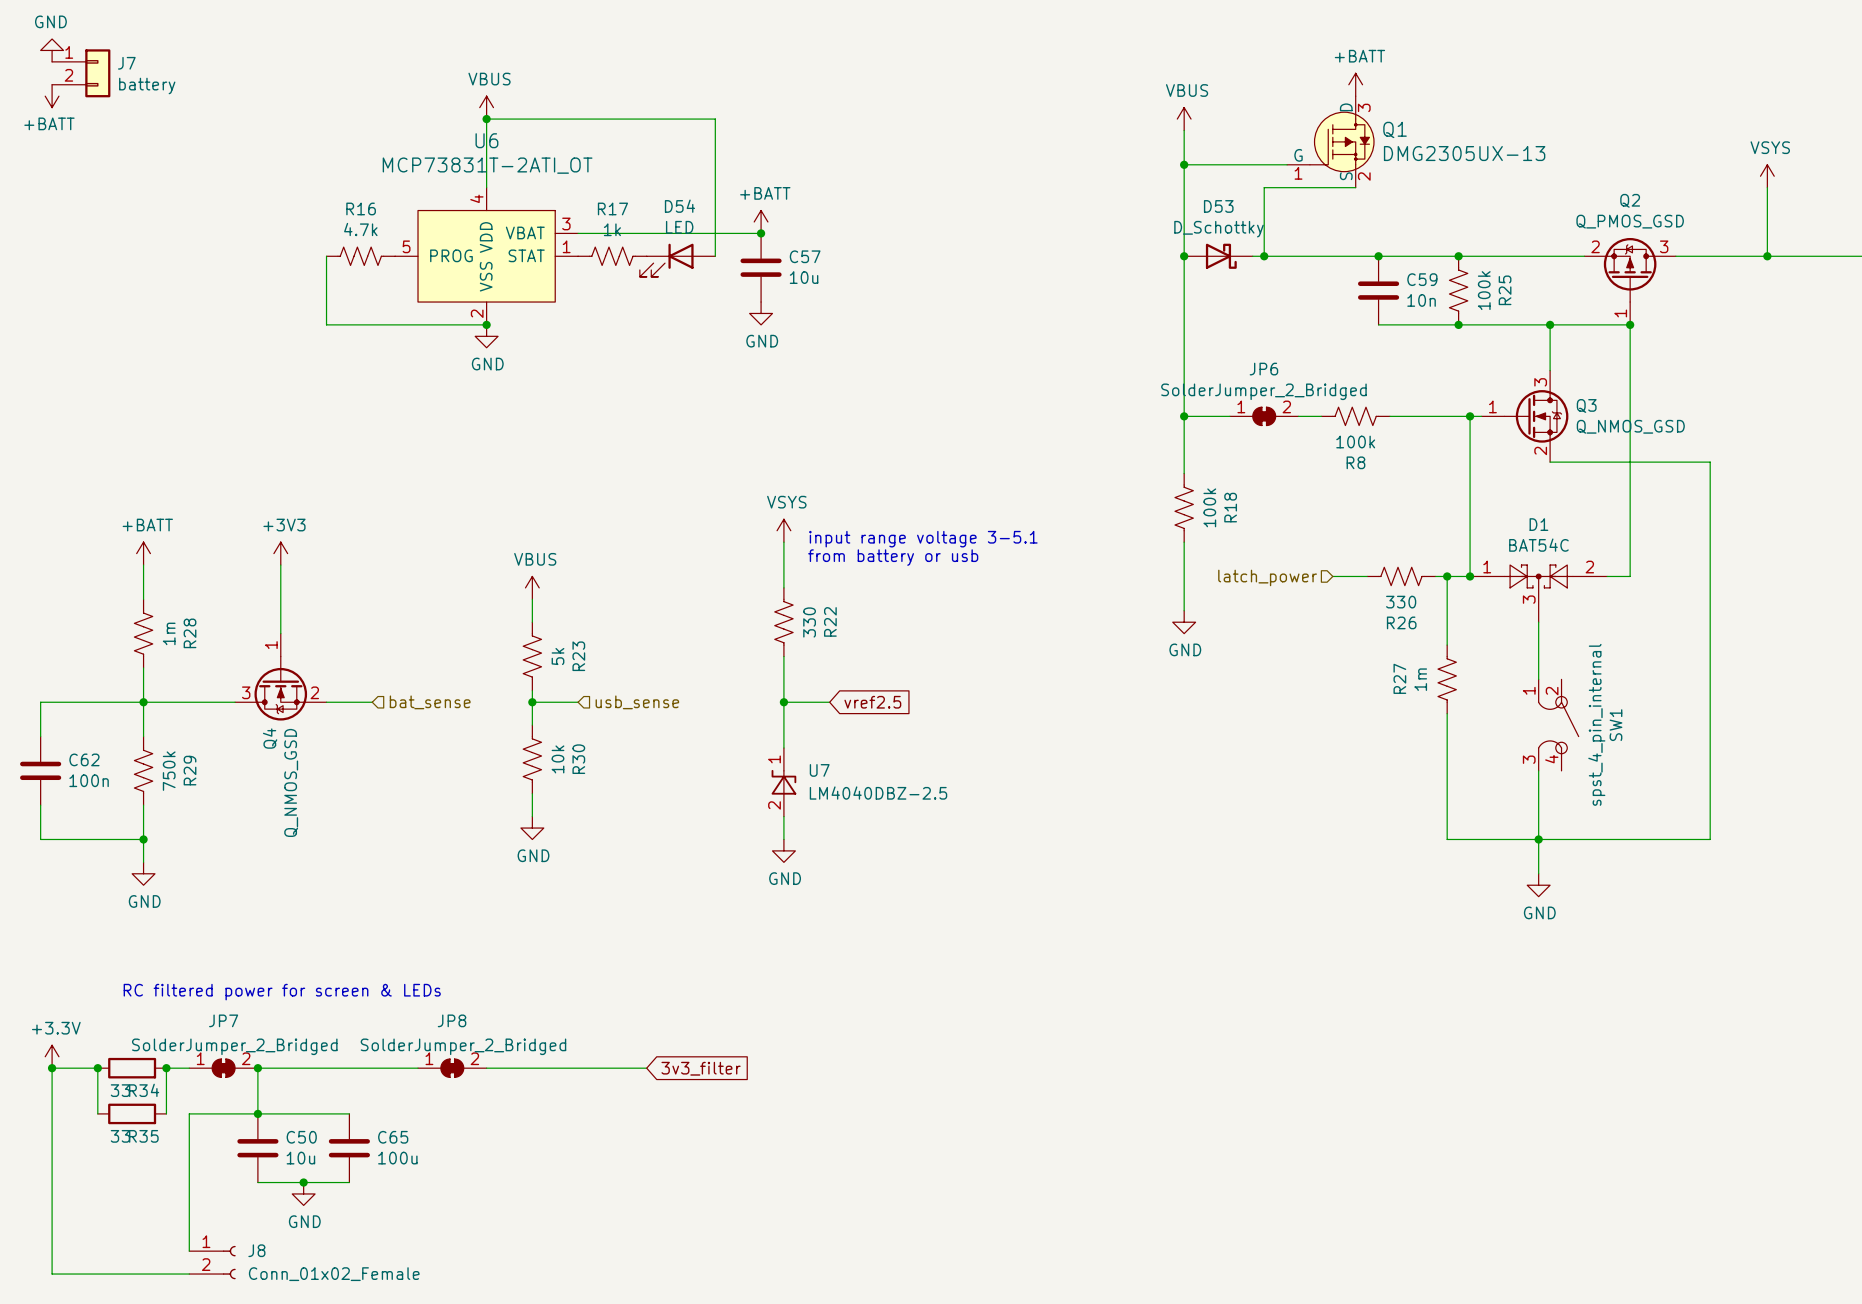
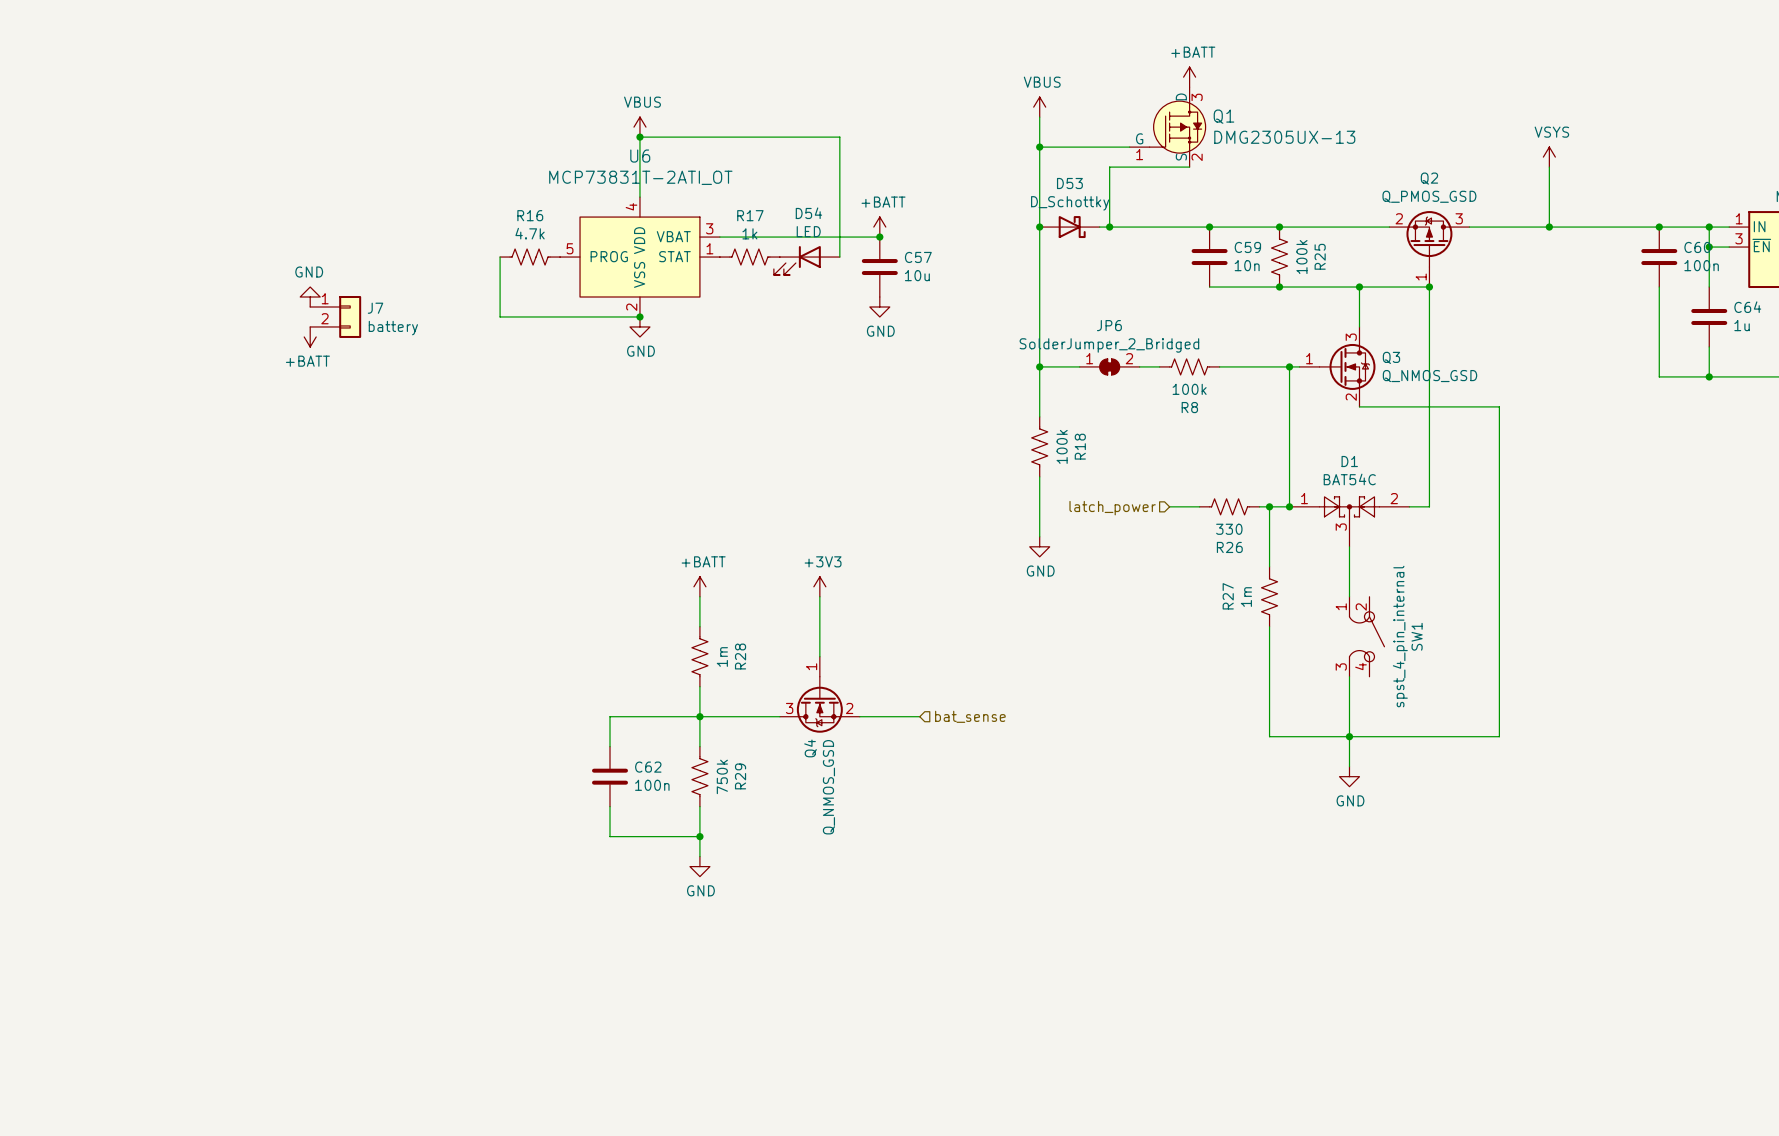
power symbol: GND (52, 50) -> none
J7 position: (81, 73) -> (335, 316)
power symbol: +BATT (52, 96) -> none
power symbol: VBUS (486, 107) -> none
junction: (486, 119) -> none
power symbol: none -> VBUS (639, 127)
junction: none -> (639, 137)
wire: (486, 187) (486, 119) (715, 119) (715, 256) -> none
wire: none -> (639, 197) (639, 137) (839, 137) (839, 257)
power symbol: +BATT (761, 221) -> none
wire: (578, 233) (761, 233) -> none
junction: (761, 233) -> none
wire: (326, 256) (326, 324) (486, 324) -> none
R16 position: (360, 256) -> (530, 257)
U6 position: (486, 256) -> (639, 257)
R17 position: (612, 256) -> (749, 257)
power symbol: none -> +BATT (879, 227)
D54 position: (677, 260) -> (806, 260)
C57 position: (761, 267) -> (879, 267)
wire: none -> (719, 237) (879, 237)
junction: none -> (879, 237)
wire: none -> (500, 257) (500, 316) (639, 316)
power symbol position: GND (761, 313) -> GND (639, 326)
junction: (486, 324) -> none
power symbol: none -> GND (310, 297)
power symbol: GND (486, 336) -> none
power symbol: none -> GND (879, 306)
junction: none -> (639, 316)
power symbol: none -> +BATT (310, 336)
power symbol: VSYS (783, 530) -> none
text: input range voltage 3-5.1 (923, 539) -> none
wire: (783, 542) (783, 587) -> none
power symbol: +BATT (143, 553) -> none
power symbol: +3V3 (280, 553) -> none
text: from battery or usb (893, 557) -> none
wire: (143, 565) (143, 599) -> none
wire: (280, 565) (280, 633) -> none
power symbol: VBUS (532, 587) -> none
wire: (532, 599) (532, 622) -> none
R22: 330 (783, 622) -> none
R28 position: (143, 633) -> (699, 656)
R23: 5k (532, 656) -> none
wire: (783, 656) (783, 747) -> none
wire: (143, 667) (143, 736) -> none
power symbol: none -> +BATT (699, 586)
power symbol: none -> +3V3 (819, 586)
Q4 position: (280, 677) -> (819, 694)
wire: none -> (699, 596) (699, 626)
wire: none -> (819, 596) (819, 656)
wire: (532, 690) (532, 725) -> none
junction: (143, 702) -> none
wire: (235, 702) (40, 702) (40, 736) -> none
wire: (326, 702) (372, 702) -> none
hierarchical label: bat_sense (430, 702) -> none
wire: (532, 702) (578, 702) -> none
junction: (532, 702) -> none
hierarchical label: usb_sense (637, 702) -> none
wire: (783, 702) (829, 702) -> none
junction: (783, 702) -> none
global label: vref2.5 (872, 702) -> none
R30: 10k (532, 759) -> none
C62 position: (40, 770) -> (609, 776)
R29 position: (143, 770) -> (699, 776)
U7: LM4040DBZ-2.5 (783, 782) -> none
wire: none -> (699, 686) (699, 746)
wire: (532, 793) (532, 816) -> none
wire: (40, 805) (40, 839) (143, 839) -> none
wire: (143, 805) (143, 862) -> none
wire: (783, 816) (783, 839) -> none
junction: none -> (699, 716)
wire: none -> (779, 716) (609, 716) (609, 746)
wire: none -> (859, 716) (919, 716)
hierarchical label: none -> bat_sense (970, 716)
power symbol: GND (532, 828) -> none
junction: (143, 839) -> none
power symbol position: GND (783, 850) -> GND (699, 866)
power symbol: GND (143, 873) -> none
wire: none -> (609, 806) (609, 836) (699, 836)
wire: none -> (699, 806) (699, 856)
junction: none -> (699, 836)
text: RC filtered power for screen & LEDs (282, 992) -> none
power symbol: +3.3V (52, 1056) -> none
junction: (52, 1068) -> none
junction: (97, 1068) -> none
R34: 33 (132, 1068) -> none
junction: (166, 1068) -> none
wire: (189, 1068) (166, 1068) (166, 1113) -> none
JP7: SolderJumper_2_Bridged (223, 1068) -> none
junction: (257, 1068) -> none
wire: (418, 1068) (257, 1068) (257, 1113) -> none
JP8: SolderJumper_2_Bridged (452, 1068) -> none
wire: (486, 1068) (646, 1068) -> none
global label: 3v3_filter (701, 1068) -> none
wire: (97, 1113) (97, 1068) (52, 1068) (52, 1274) (189, 1274) -> none
R35: 33 (132, 1113) -> none
junction: (257, 1113) -> none
wire: (349, 1113) (189, 1113) (189, 1251) -> none
C50: 10u (257, 1148) -> none
C65: 100u (349, 1148) -> none
wire: (257, 1182) (349, 1182) -> none
junction: (303, 1182) -> none
power symbol: GND (303, 1193) -> none
J8: Conn_01x02_Female (212, 1262) -> none

